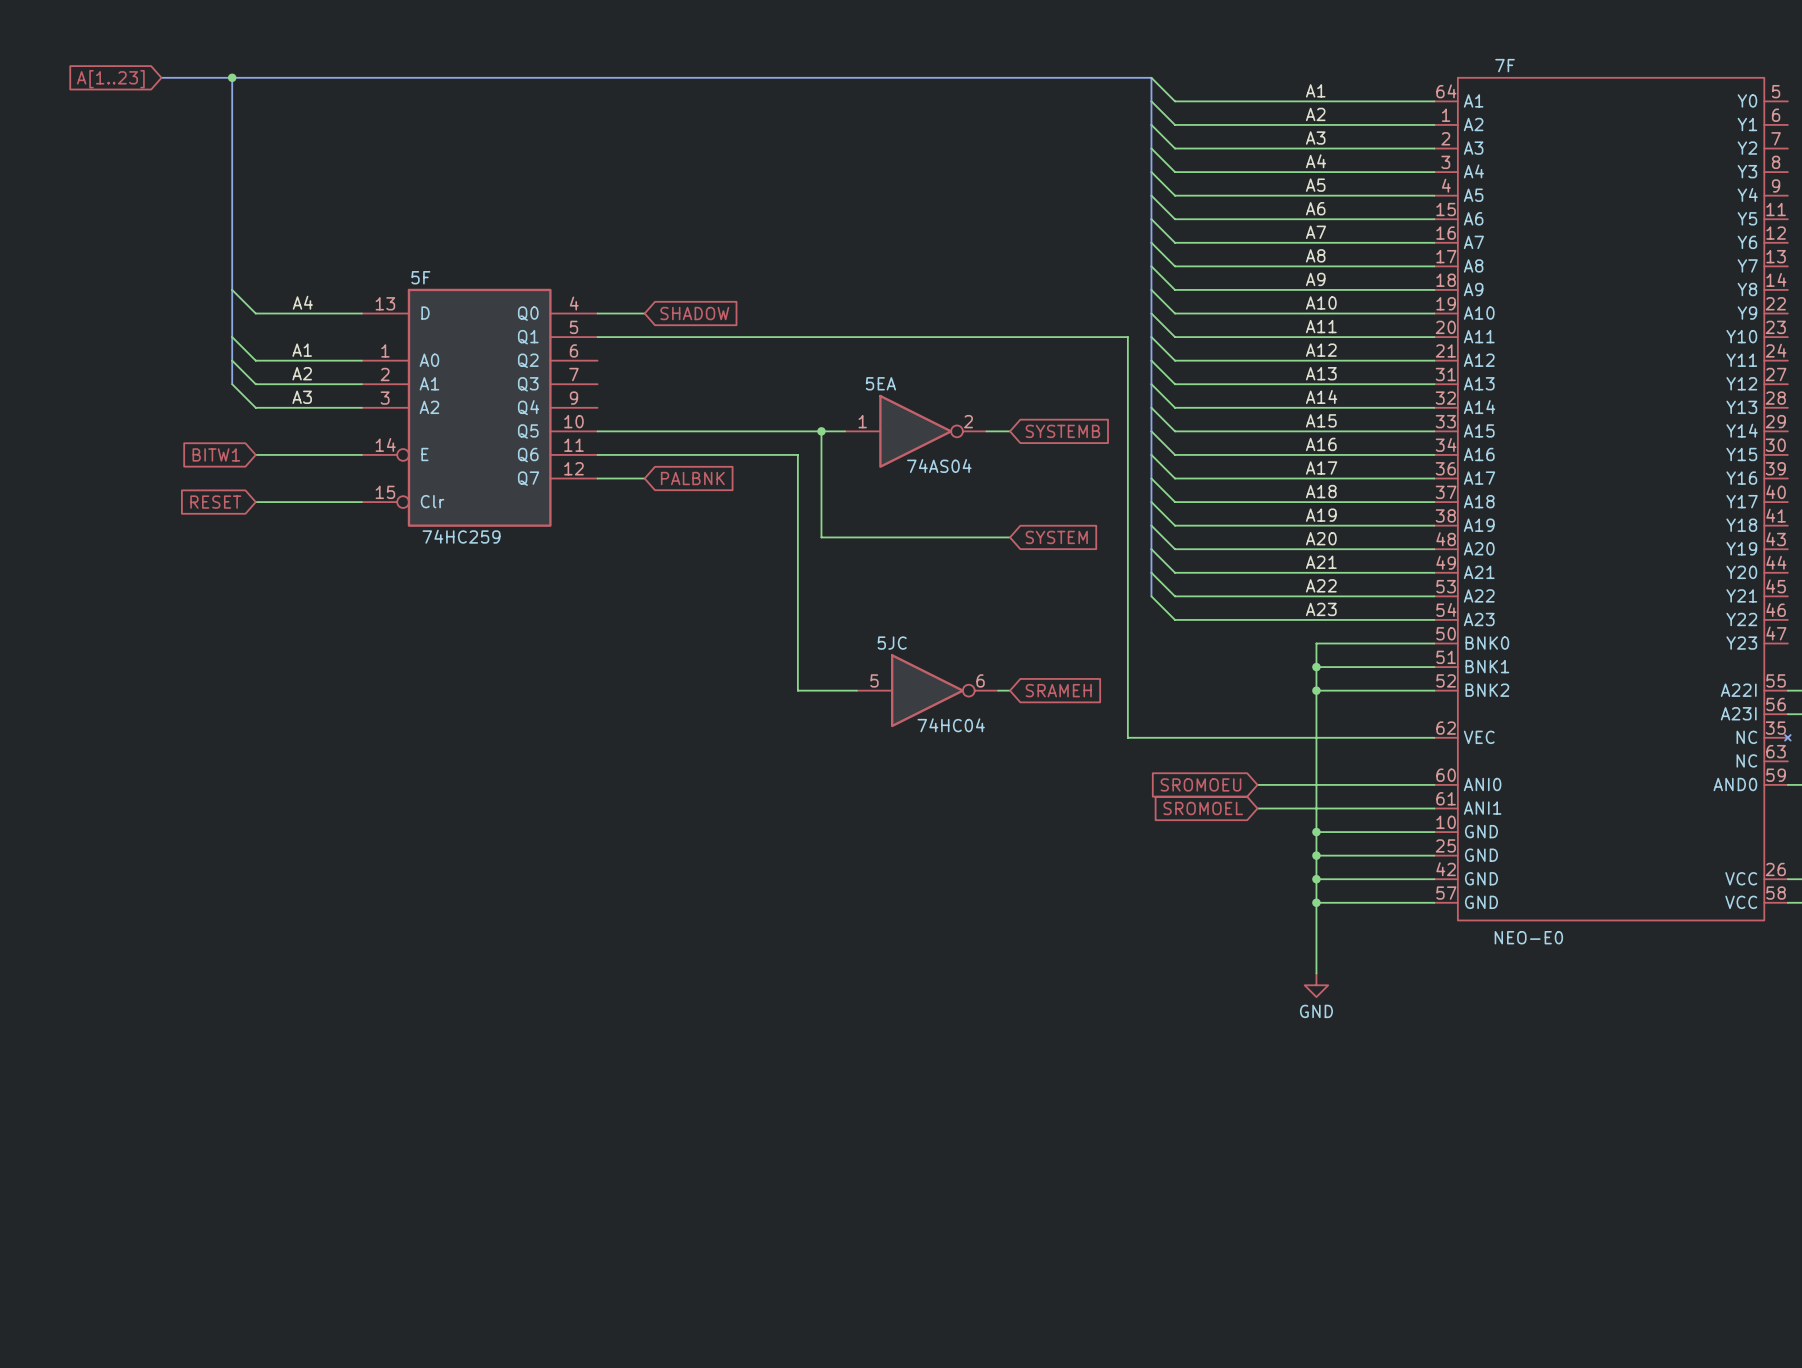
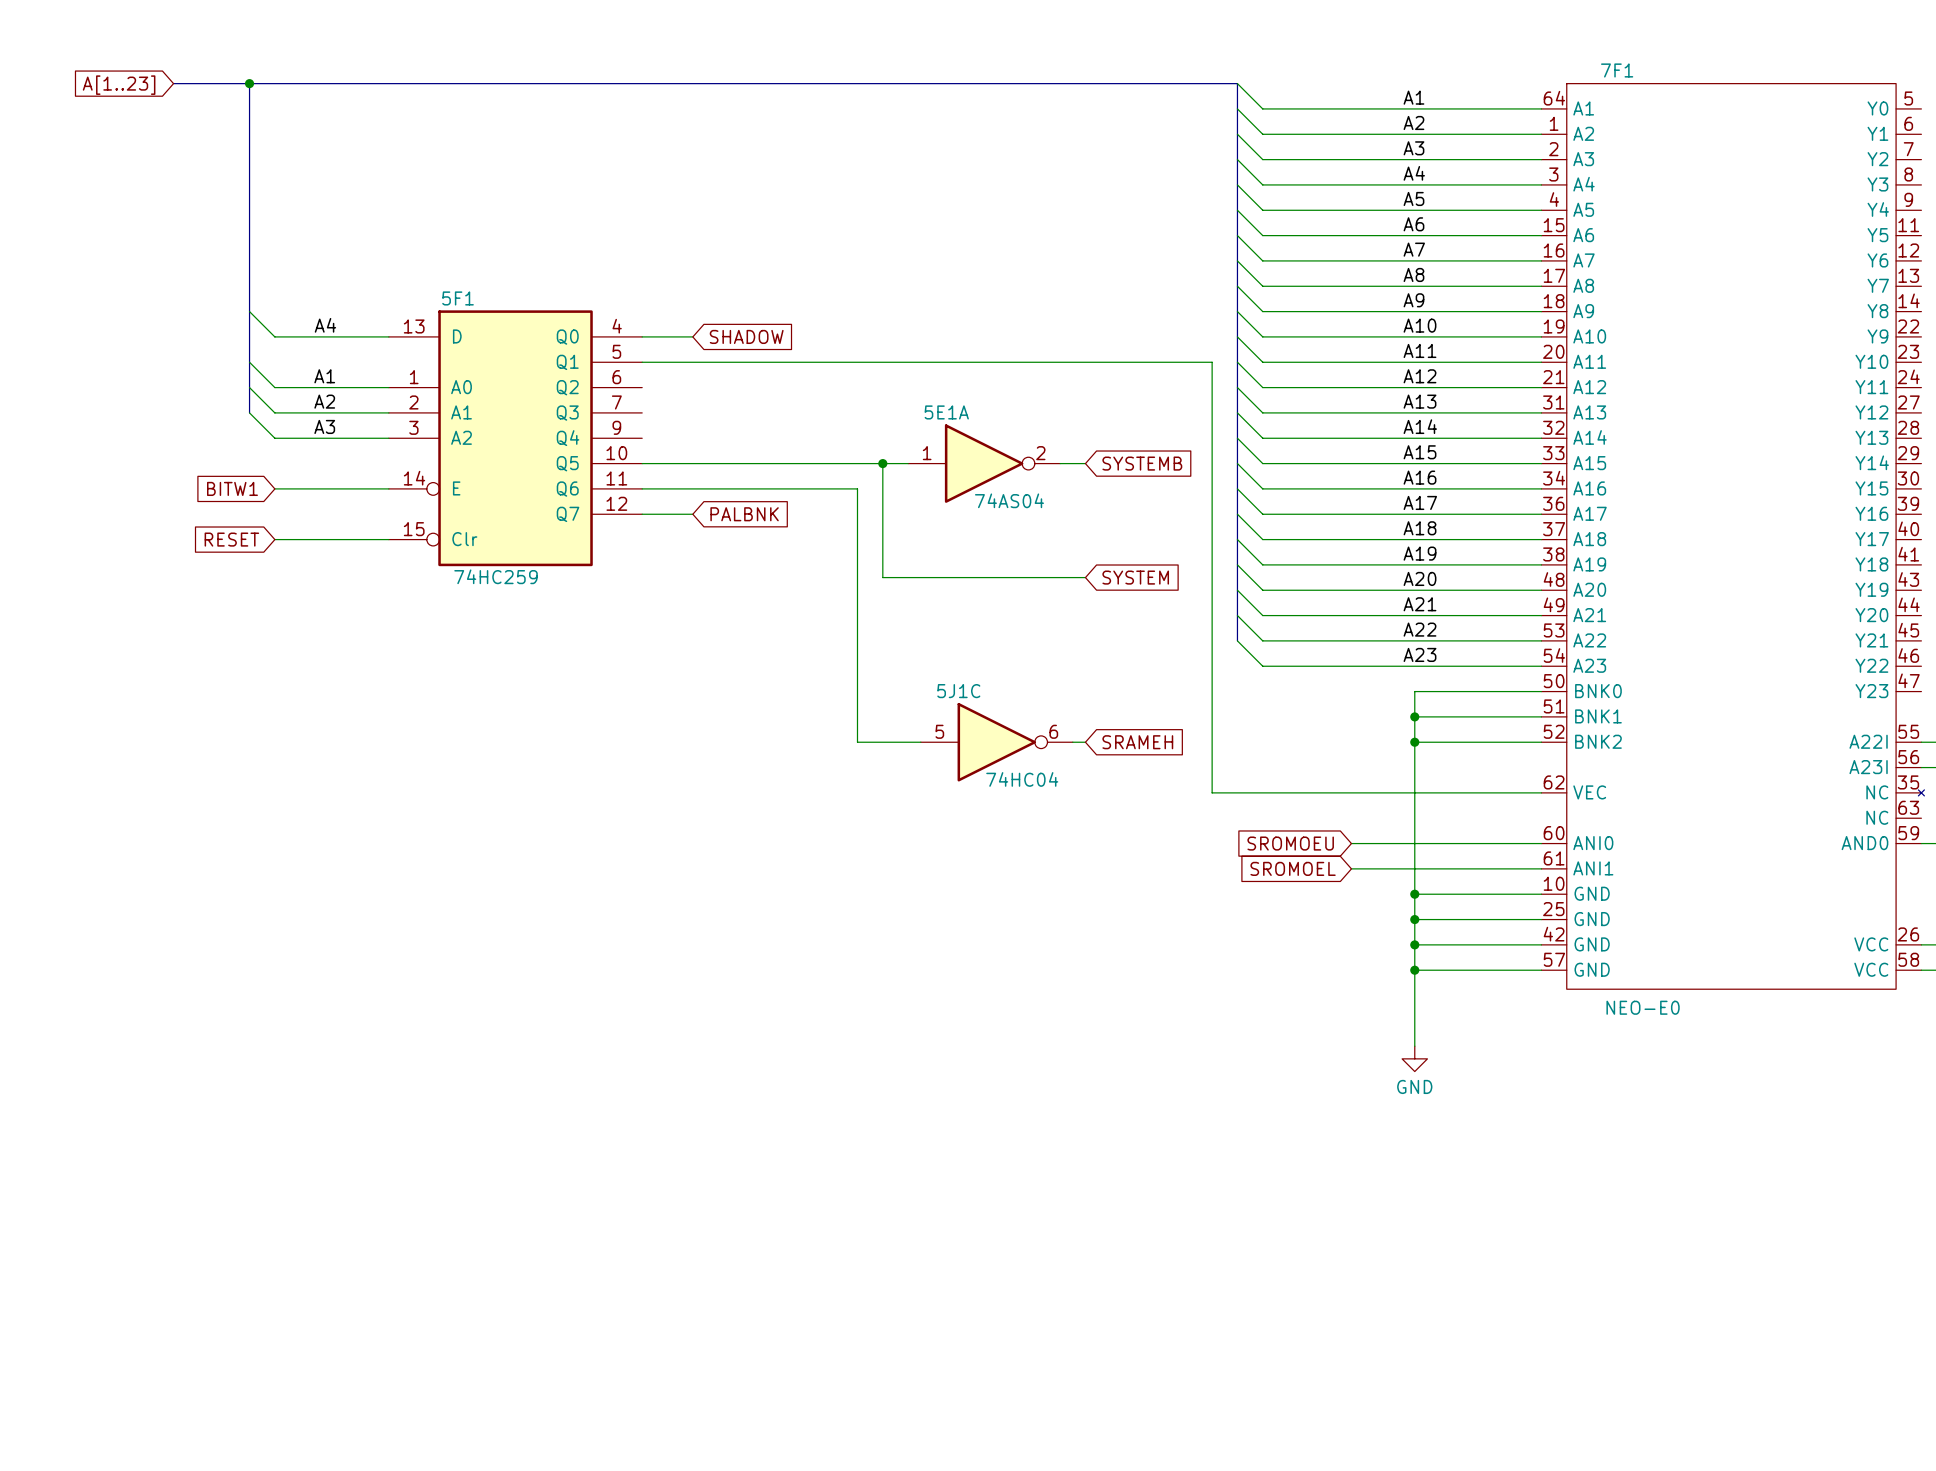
7F name: 7F (1505, 65) -> 7F1 (1617, 70)
5F name: 5F (420, 277) -> 5F1 (458, 298)
5EA name: 5EA (880, 383) -> 5E1A (946, 412)
5JC name: 5JC (892, 643) -> 5J1C (958, 691)

